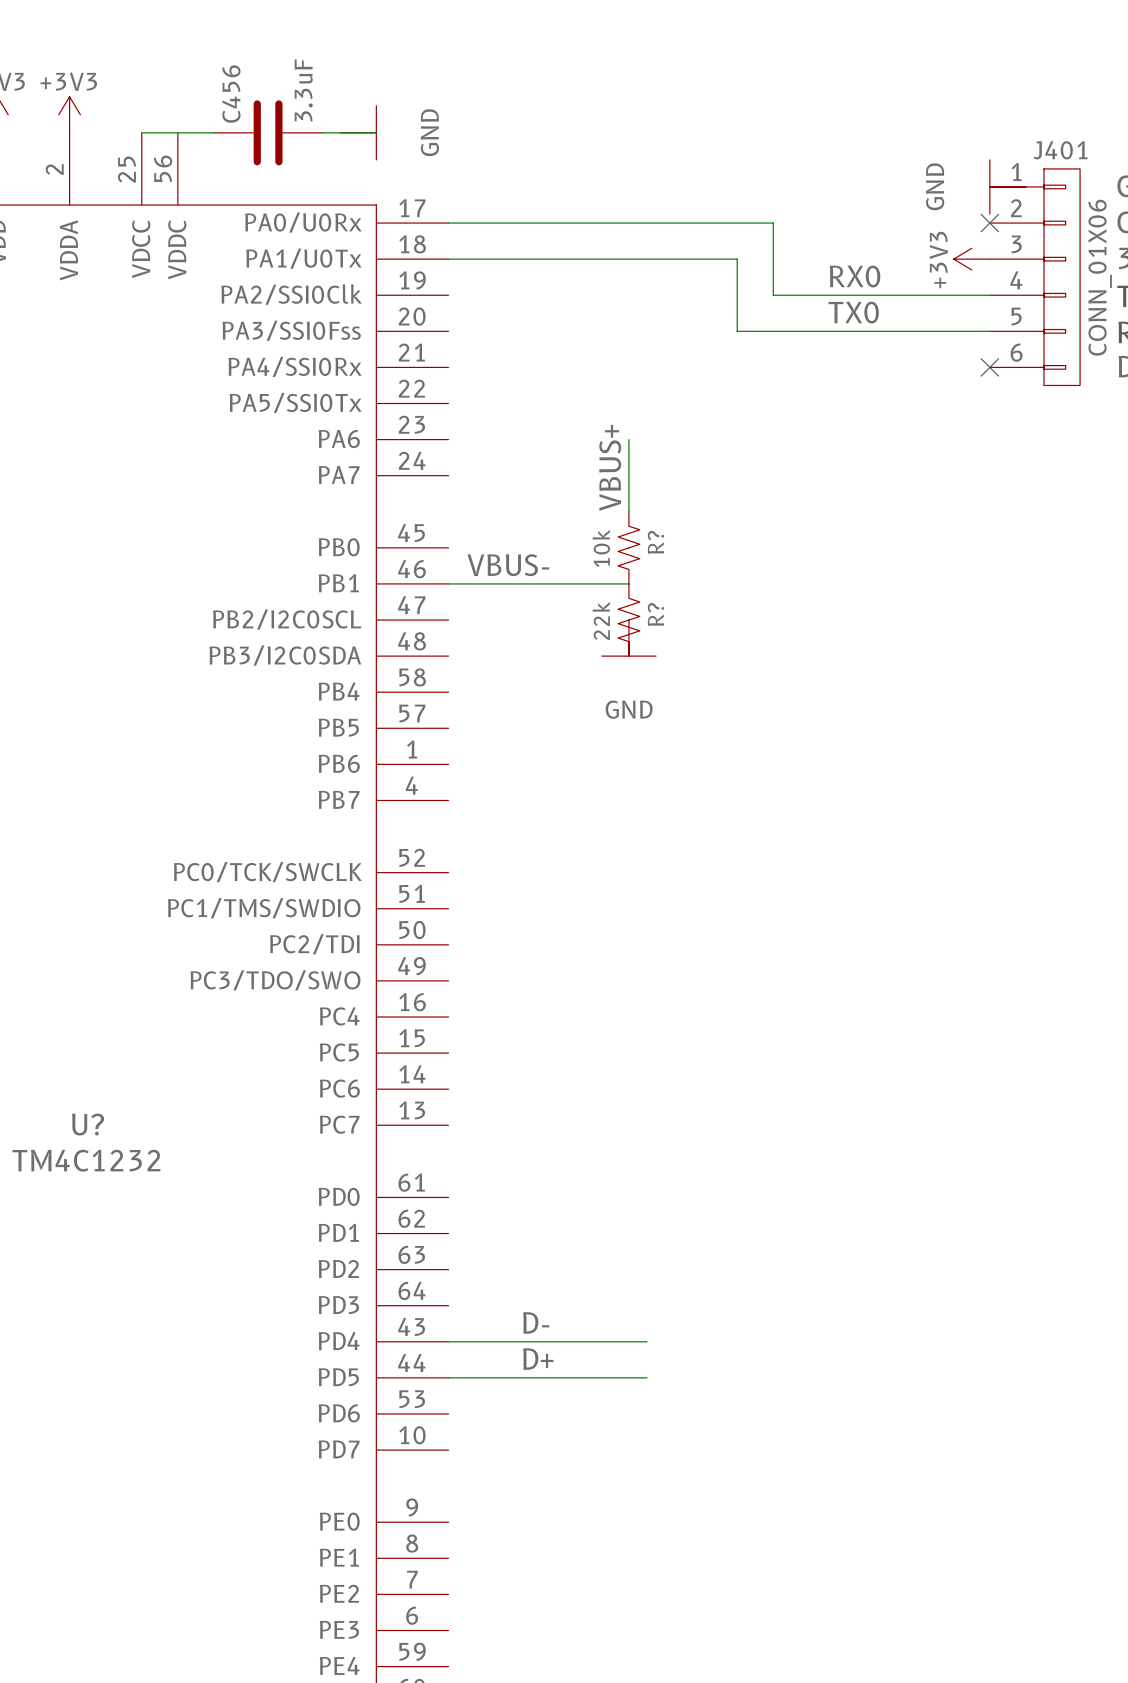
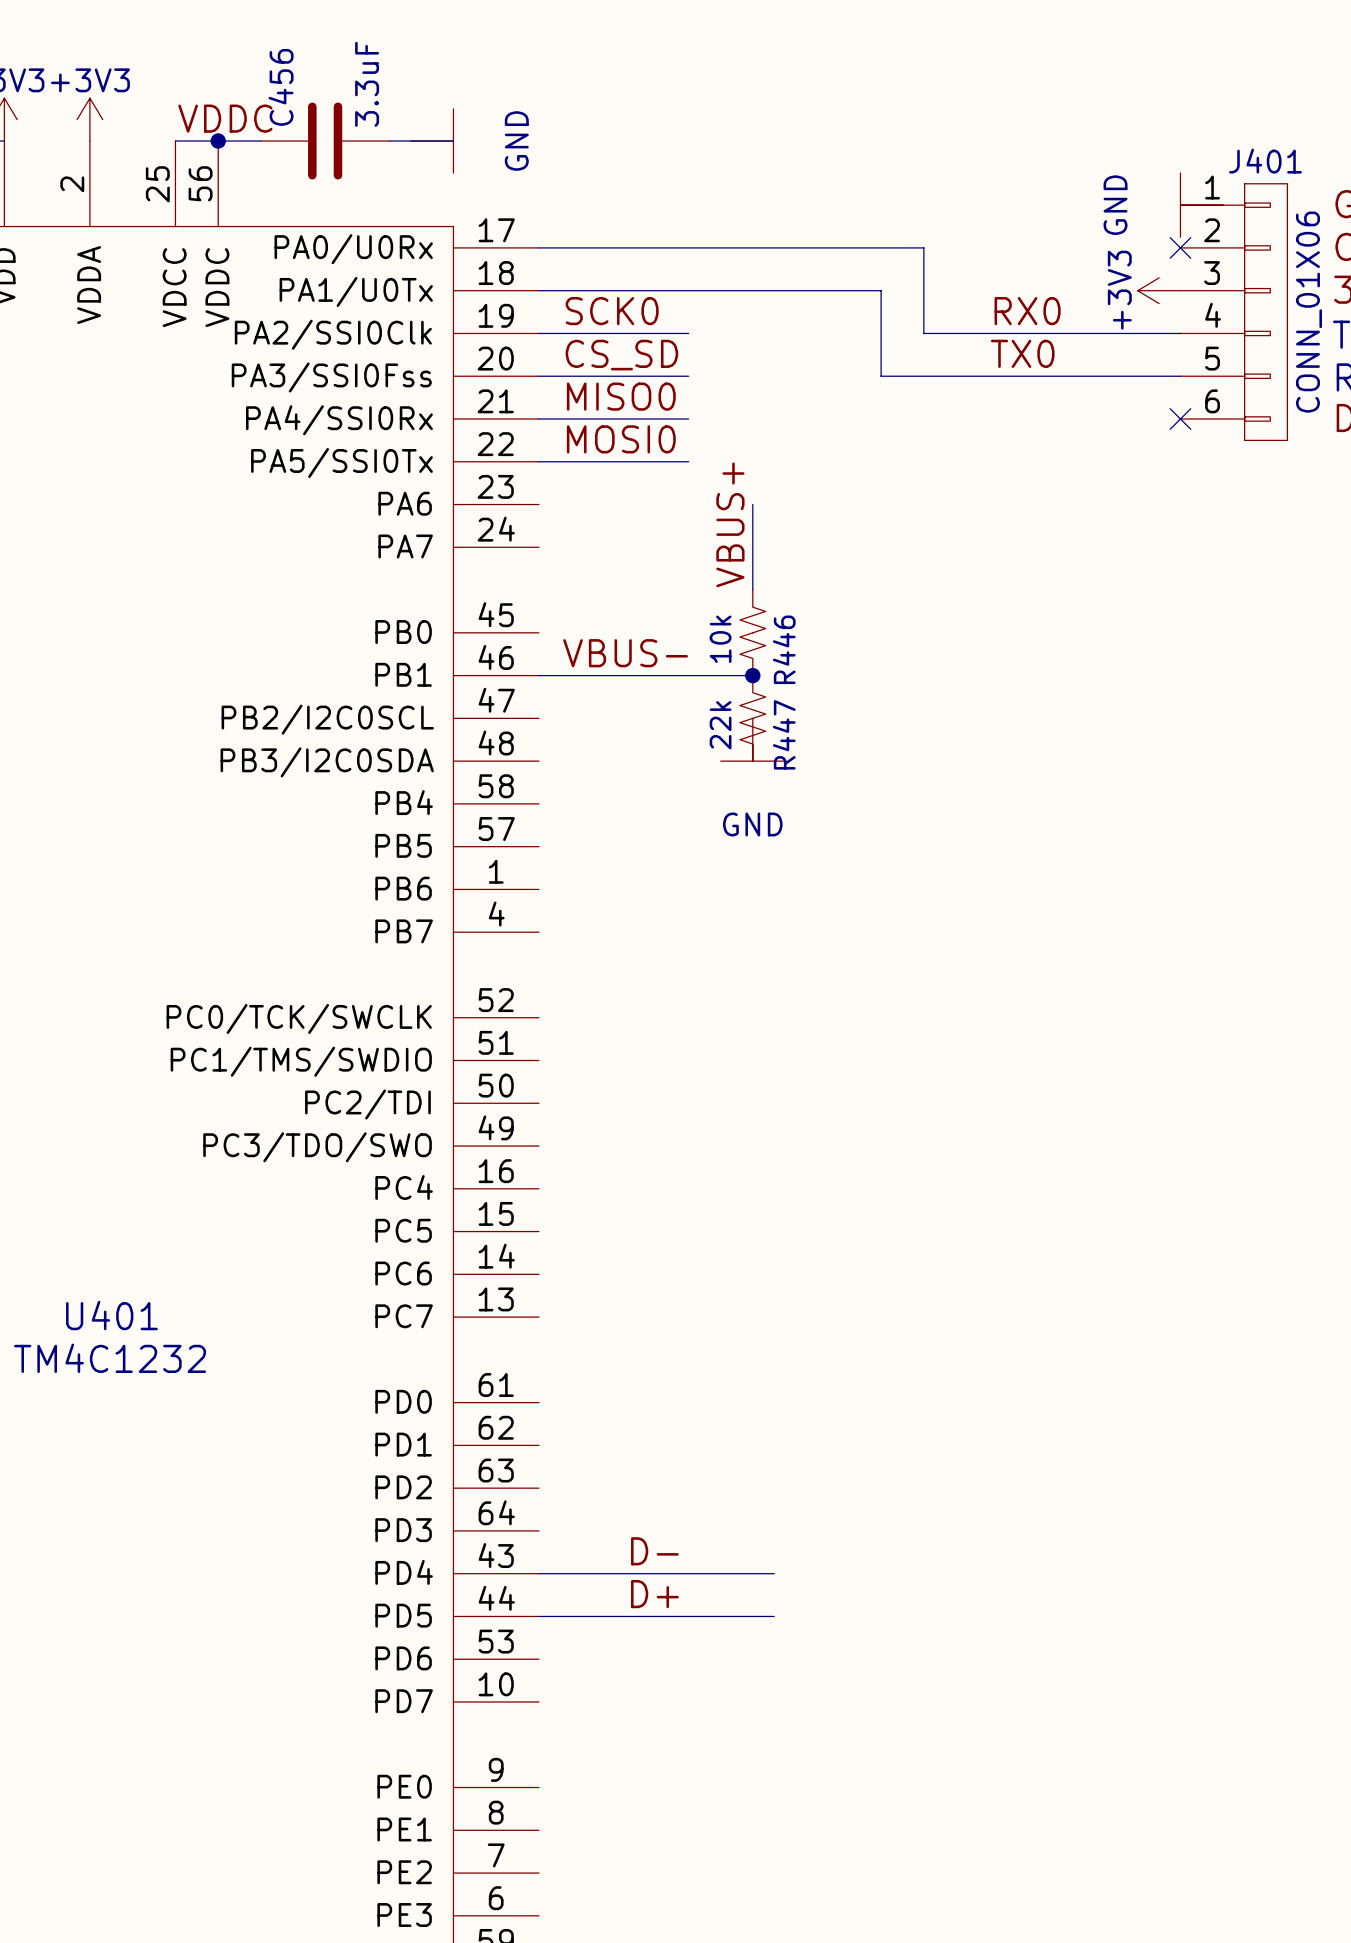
label: none -> VDDC (225, 118)
junction: none -> (218, 141)
label: none -> SCK0 (612, 311)
wire: none -> (538, 333) (688, 333)
label: none -> CS_SD (621, 355)
wire: none -> (538, 376) (688, 376)
label: none -> MISO0 (621, 396)
wire: none -> (538, 419) (688, 419)
label: none -> MOSI0 (621, 439)
wire: none -> (538, 461) (688, 461)
R? name: R? (655, 542) -> R446 (784, 649)
junction: none -> (752, 675)
R? name: R? (655, 614) -> R447 (784, 734)
U? name: U? (87, 1124) -> U401 (111, 1315)

